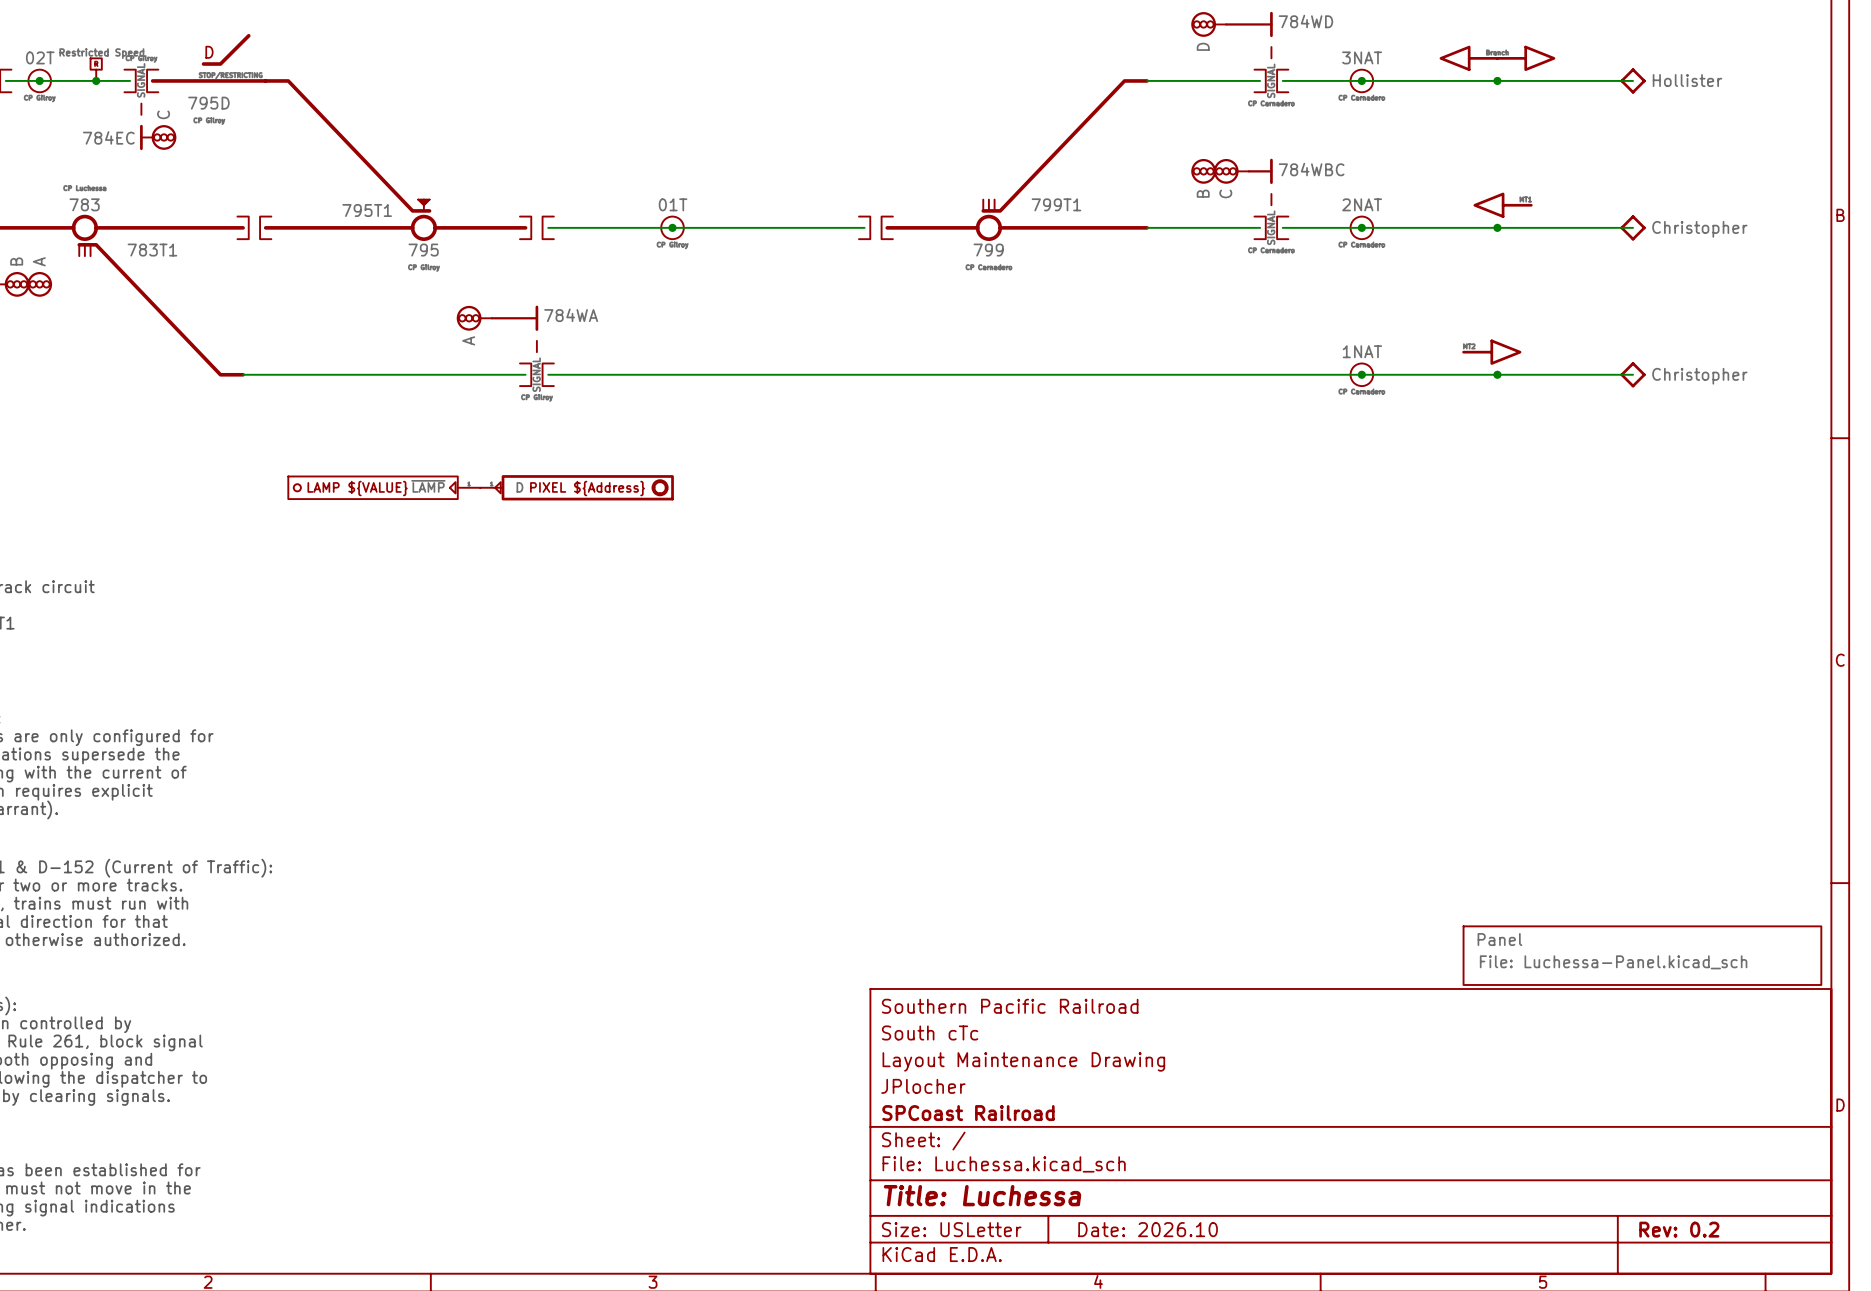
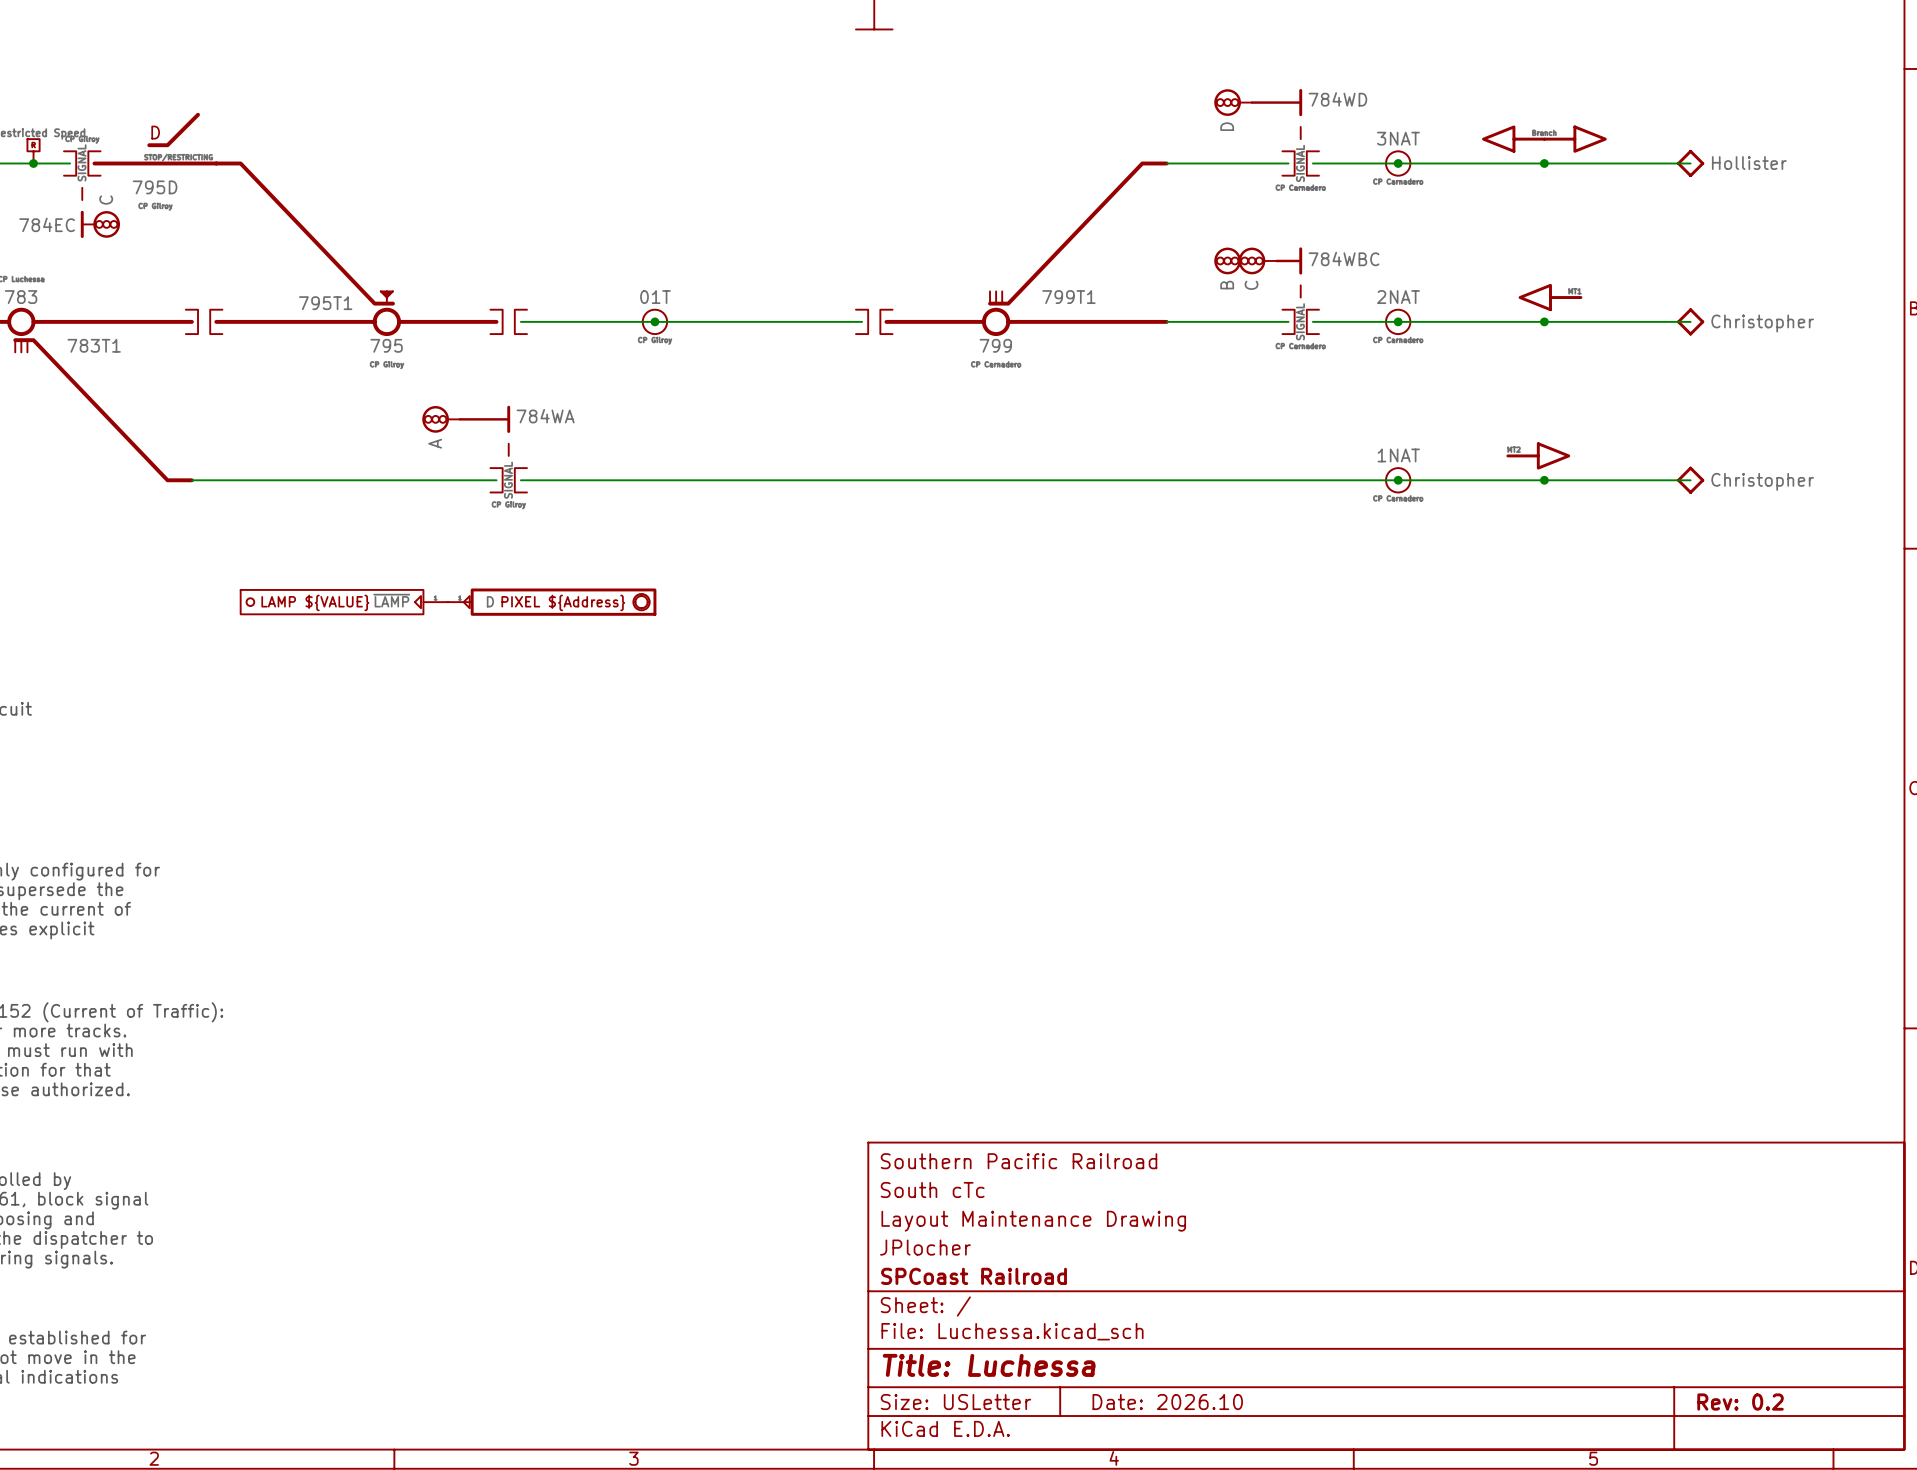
sheet Panel: File: Luchessa-Panel.kicad_sch (1642, 955) -> none

